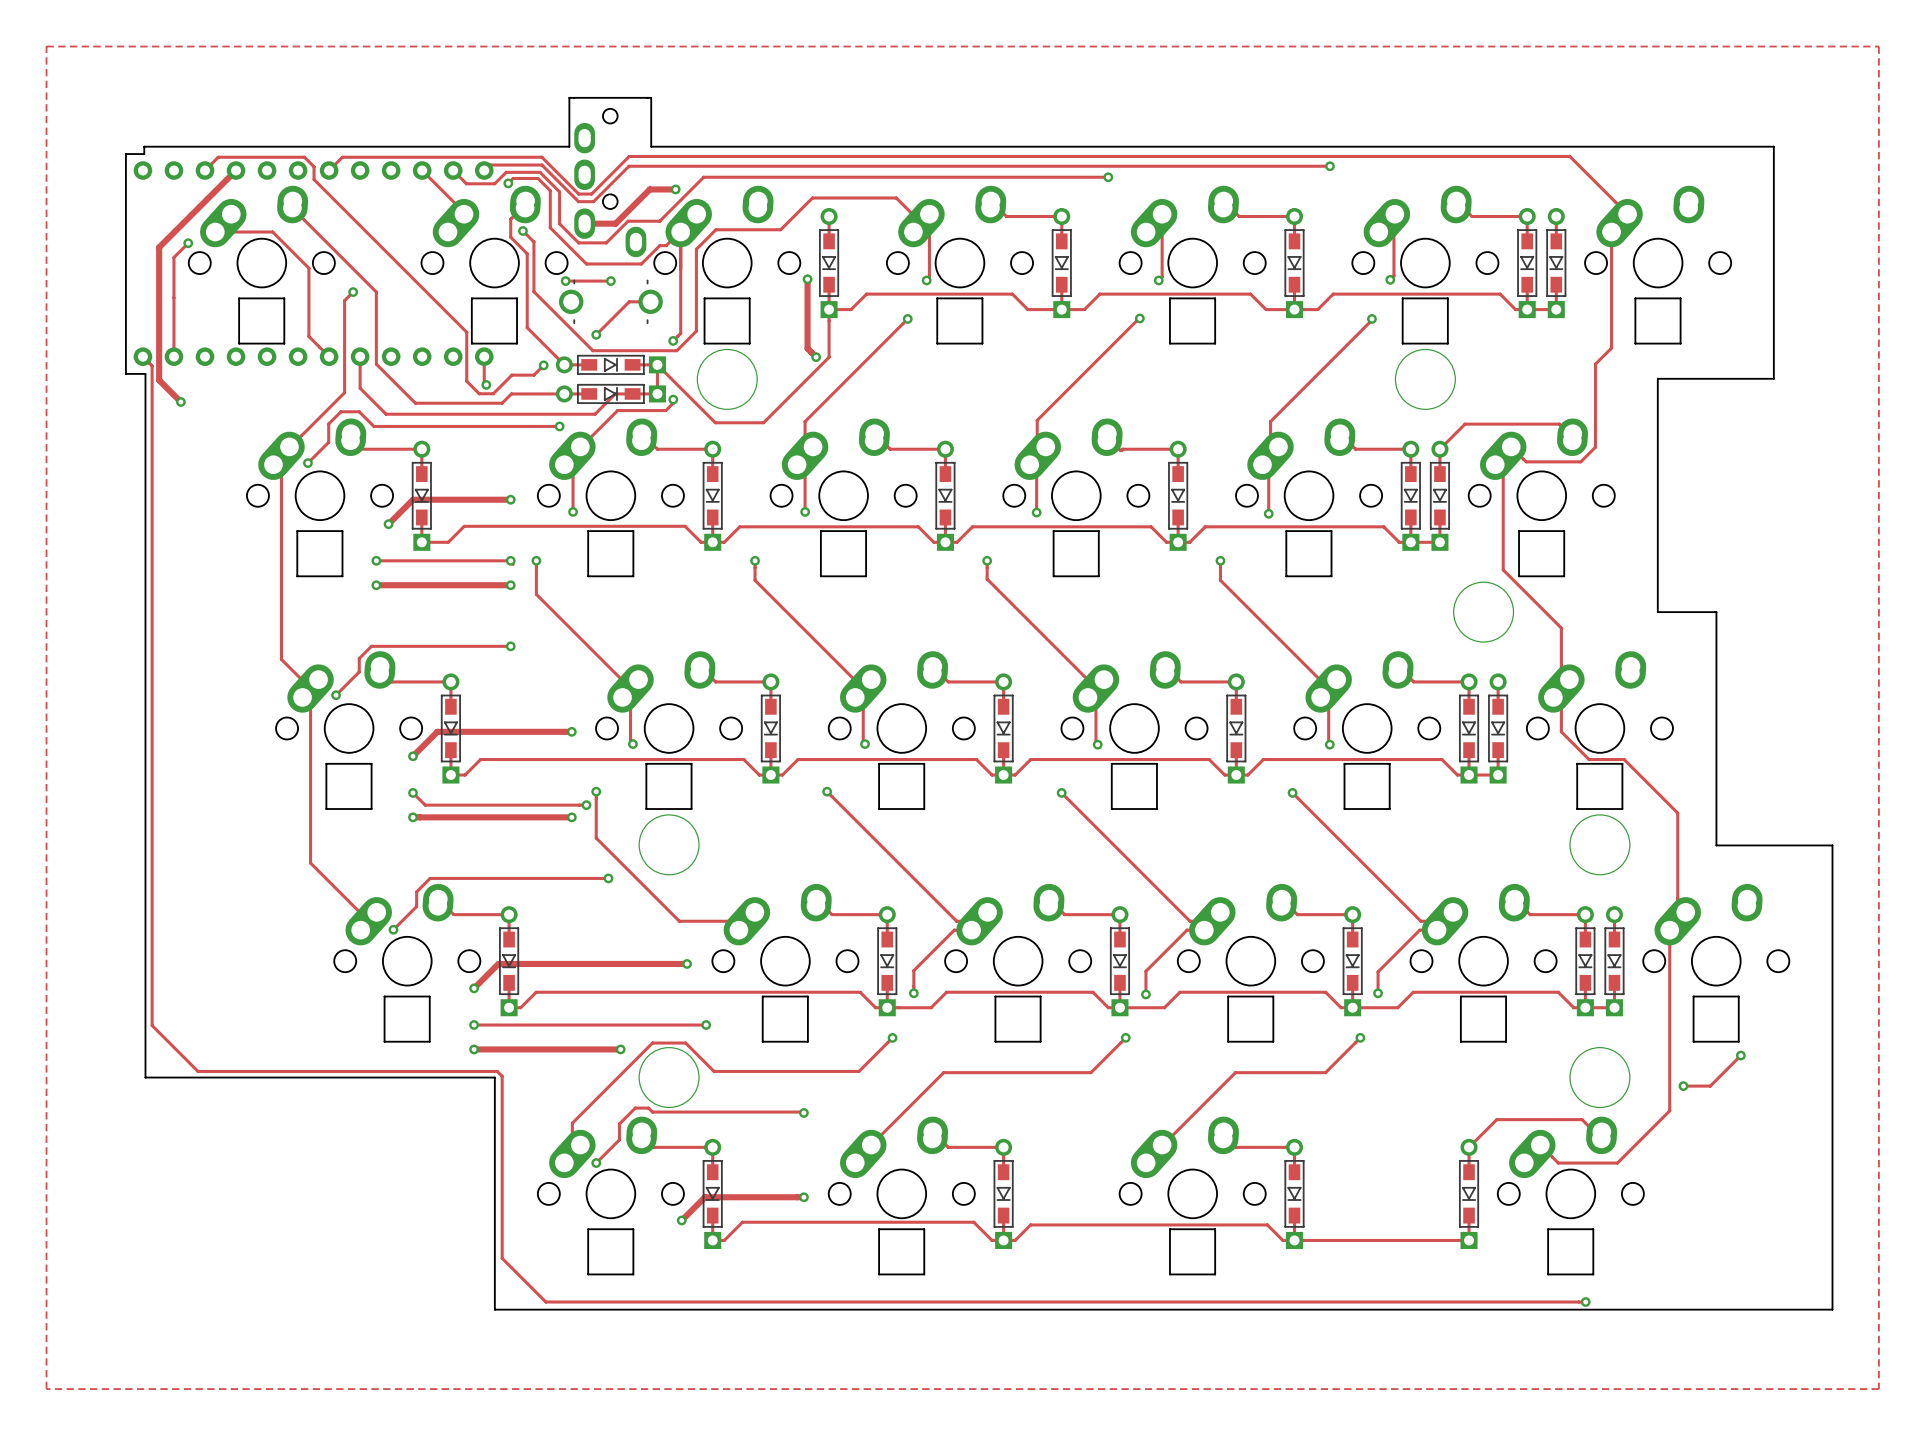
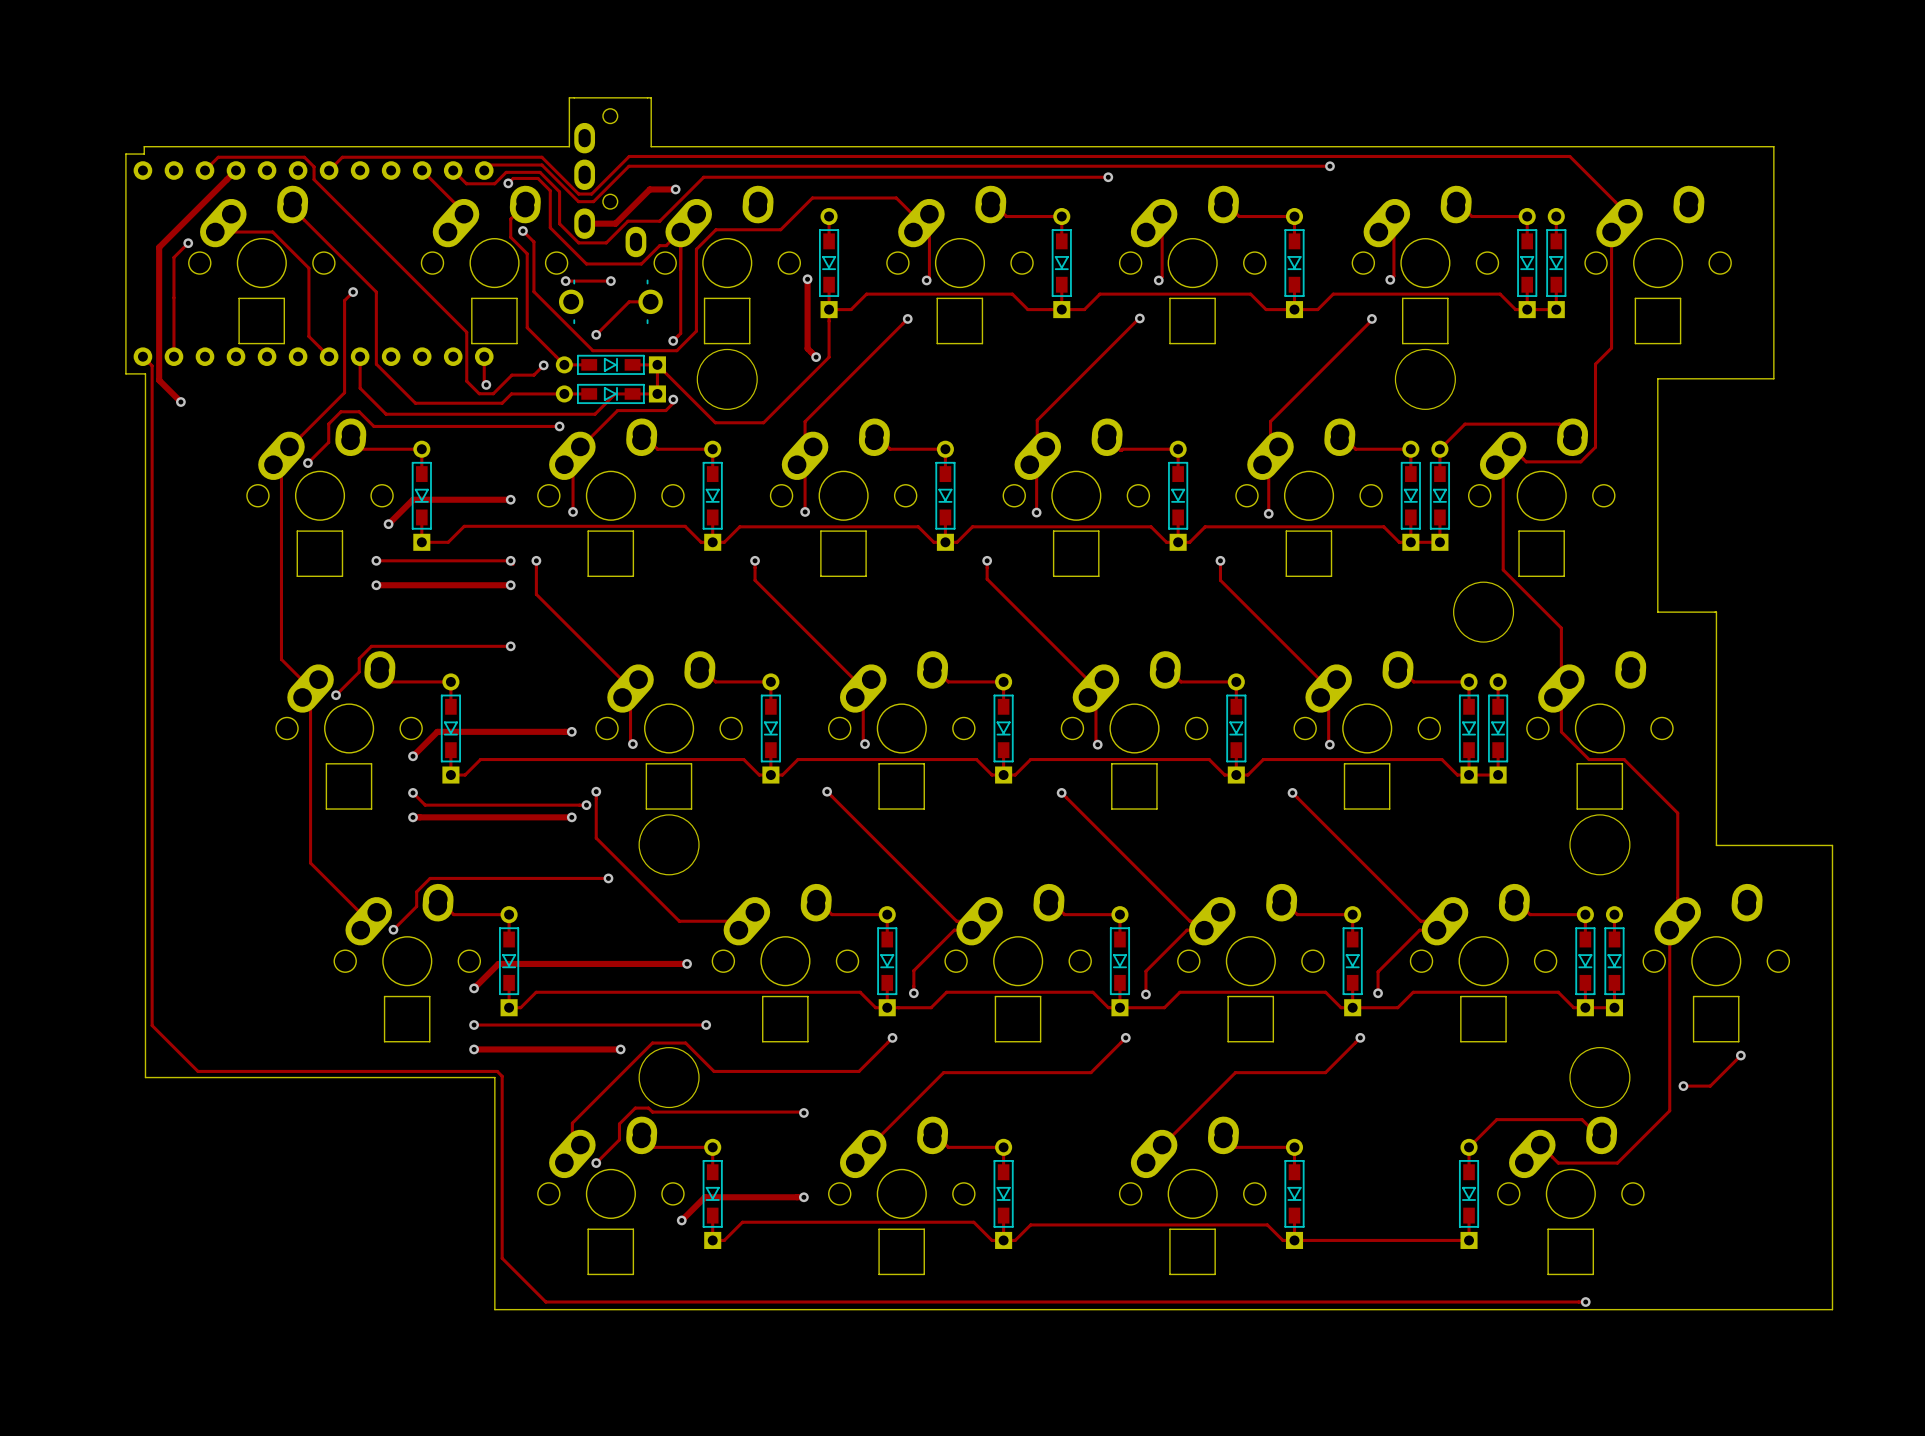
zone outline: (46, 46) (46, 1389) (1878, 1389) (1878, 46) (46, 46) -> none

